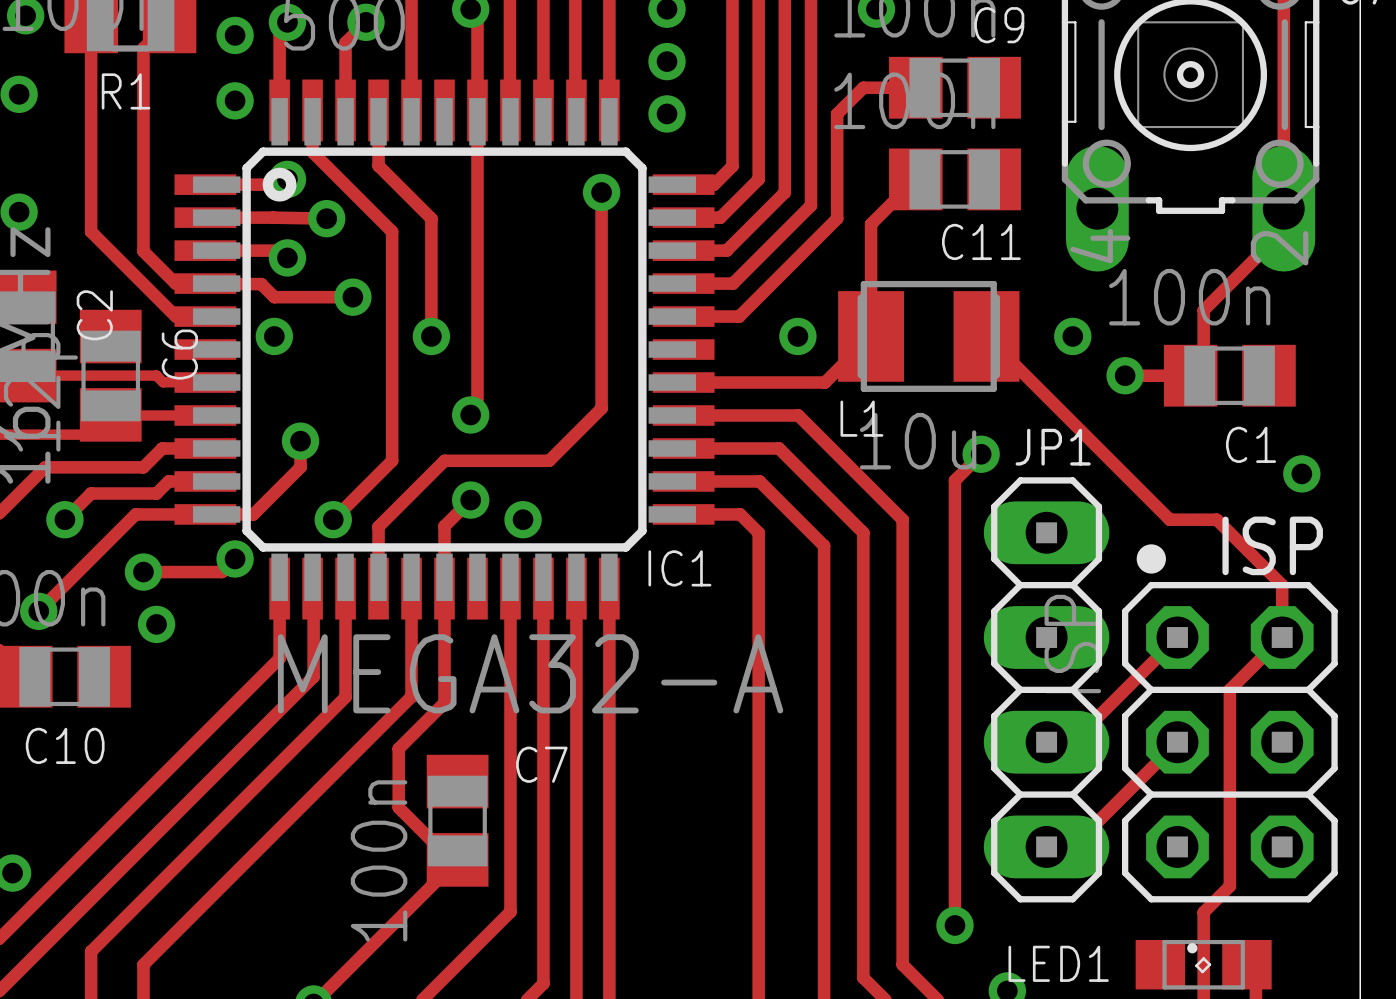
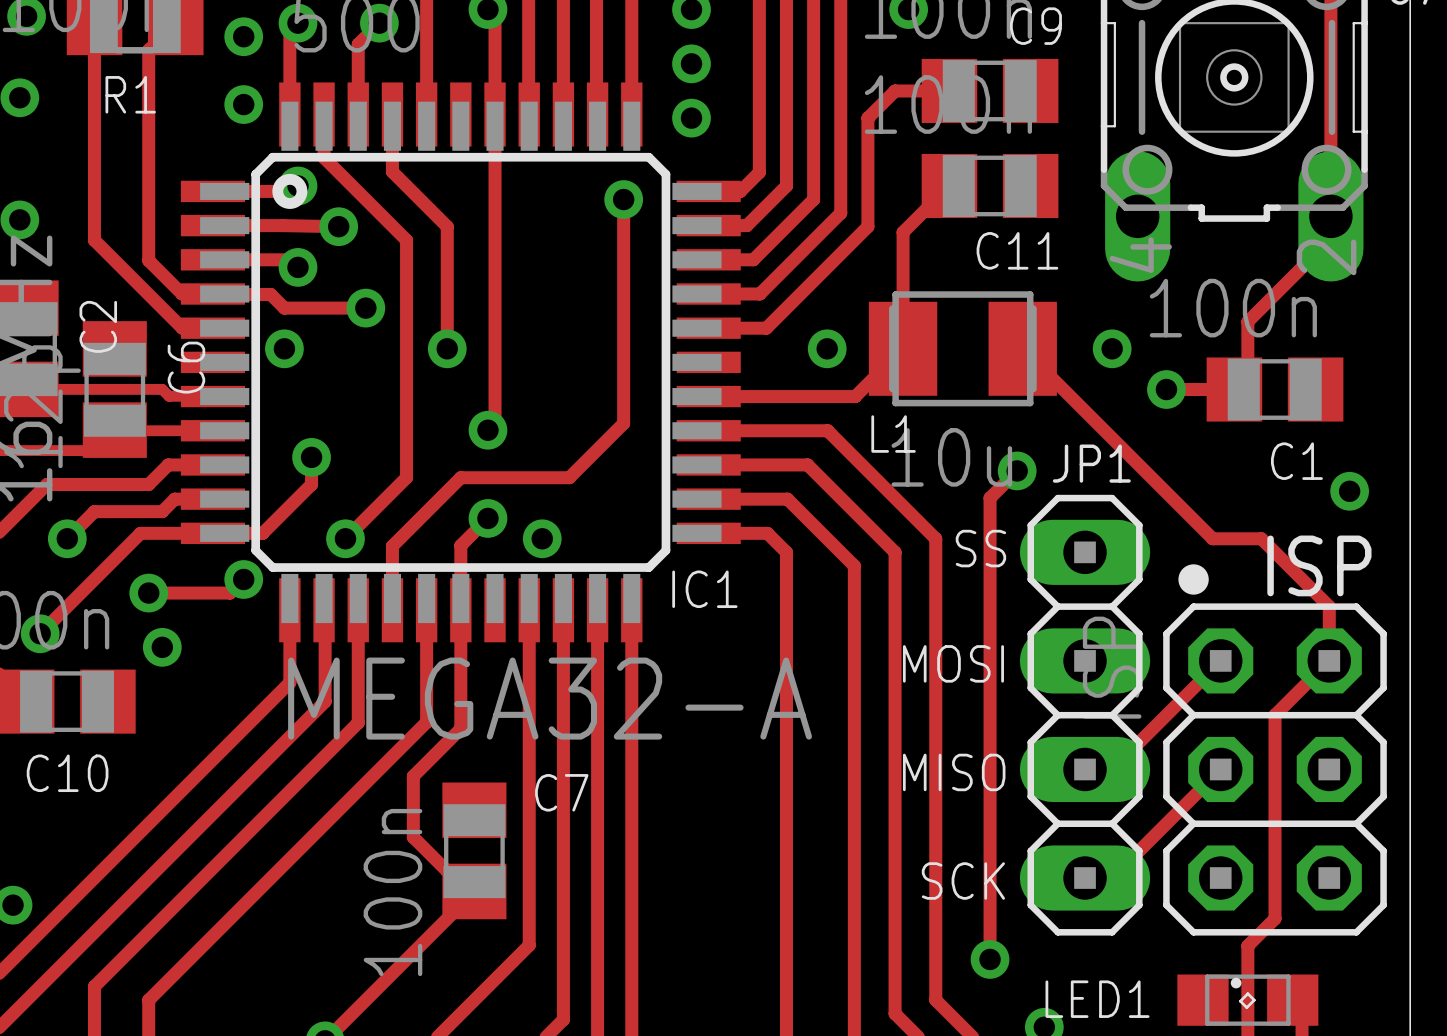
text: none -> SS (980, 548)
text: none -> MOSI (953, 663)
text: none -> MISO (954, 772)
text: none -> SCK (963, 881)

